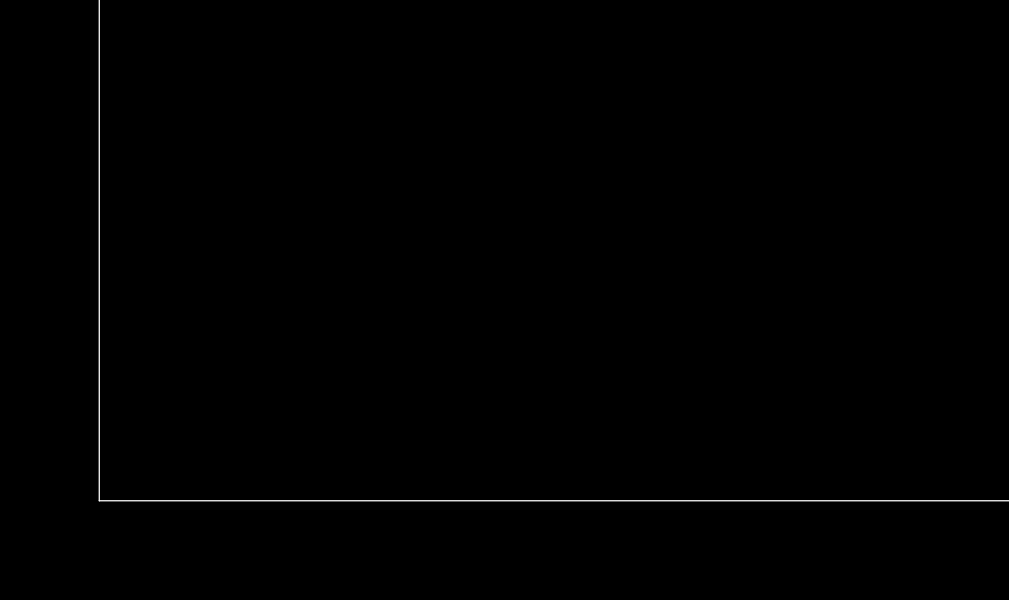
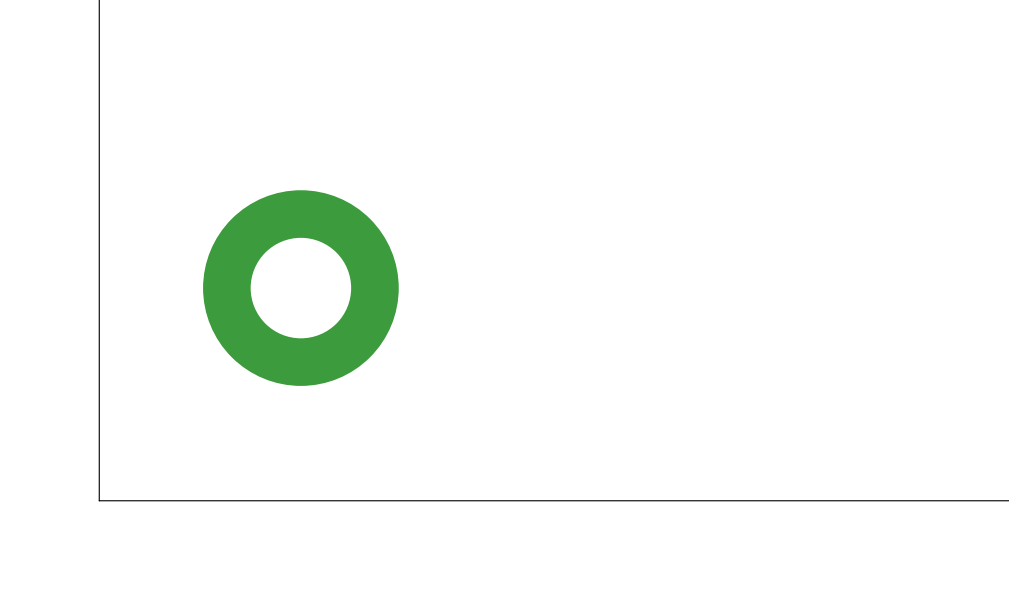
part: none -> (300, 288)

